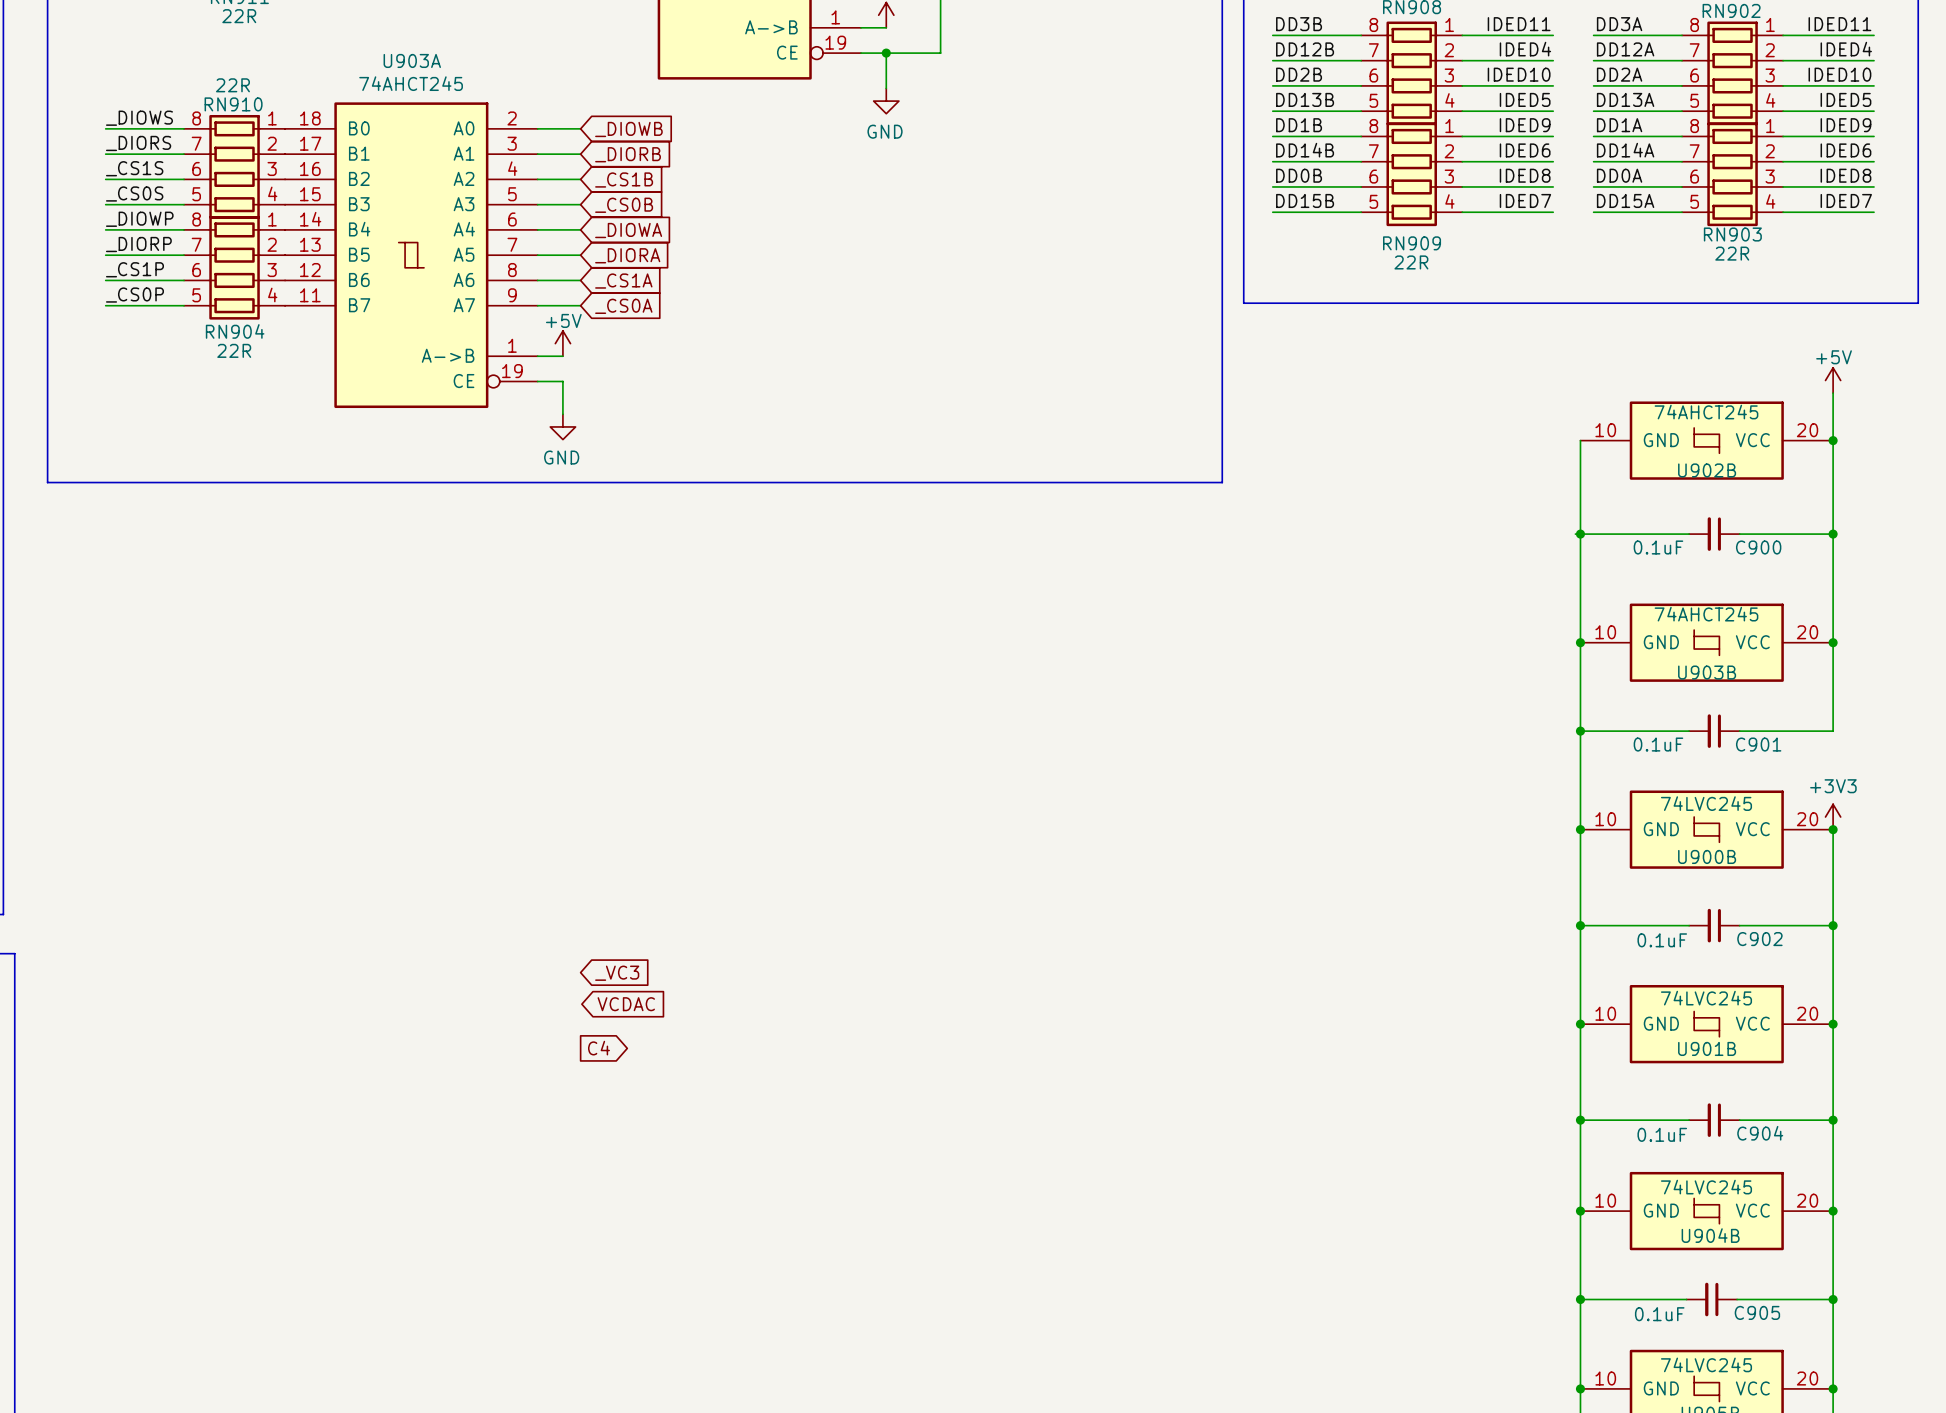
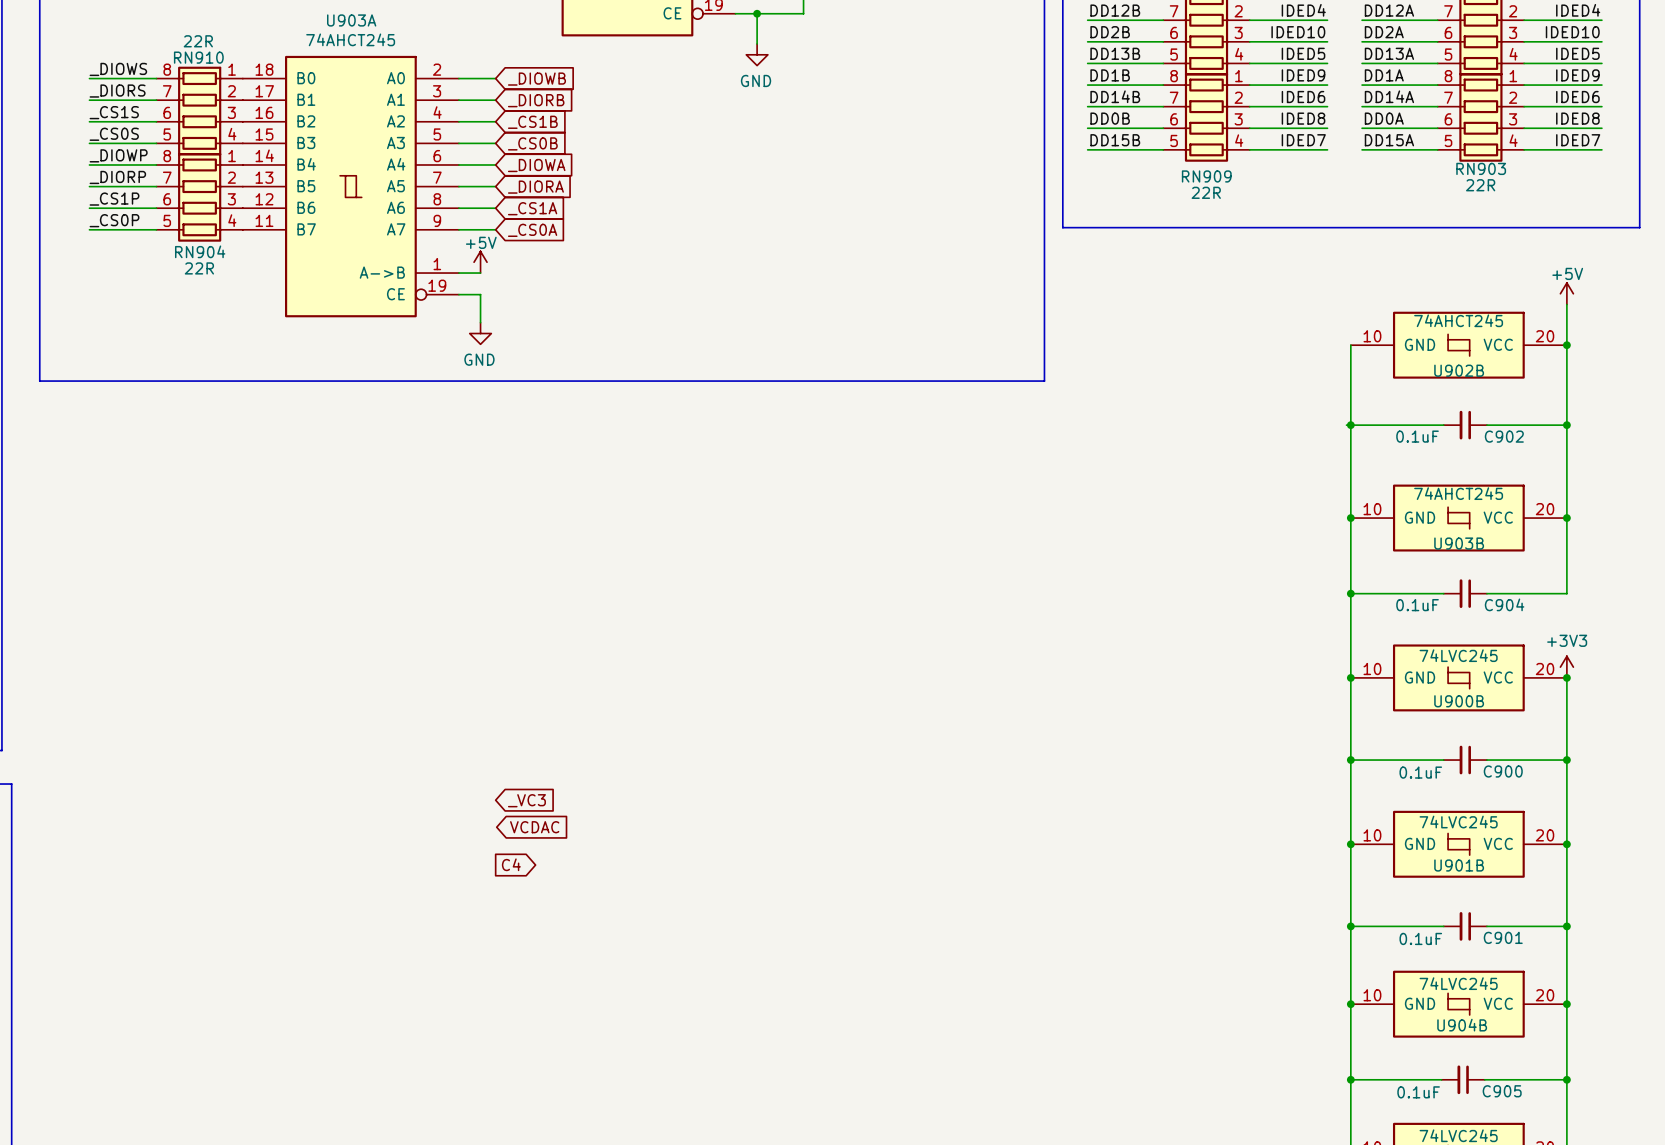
C900 name: C900 (1758, 547) -> C902 (1504, 436)
C901 name: C901 (1758, 744) -> C904 (1504, 604)
C902 name: C902 (1759, 939) -> C900 (1503, 771)
C904 name: C904 (1760, 1133) -> C901 (1503, 937)

